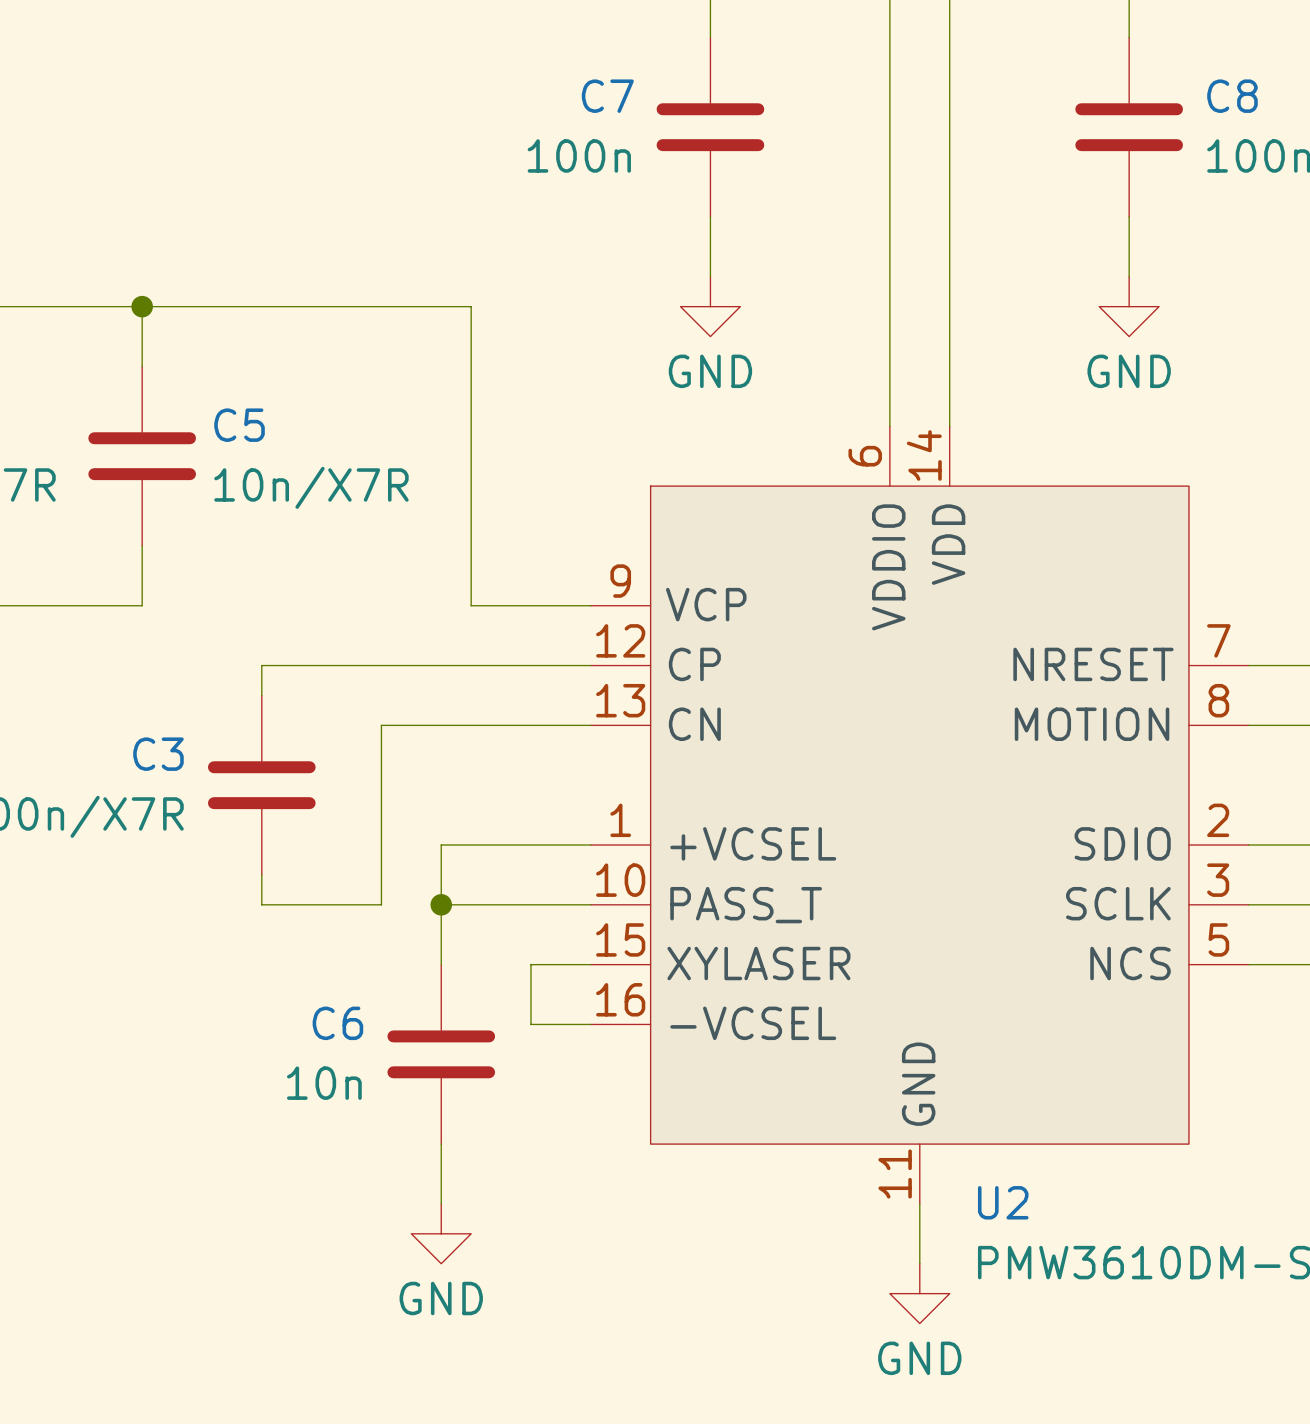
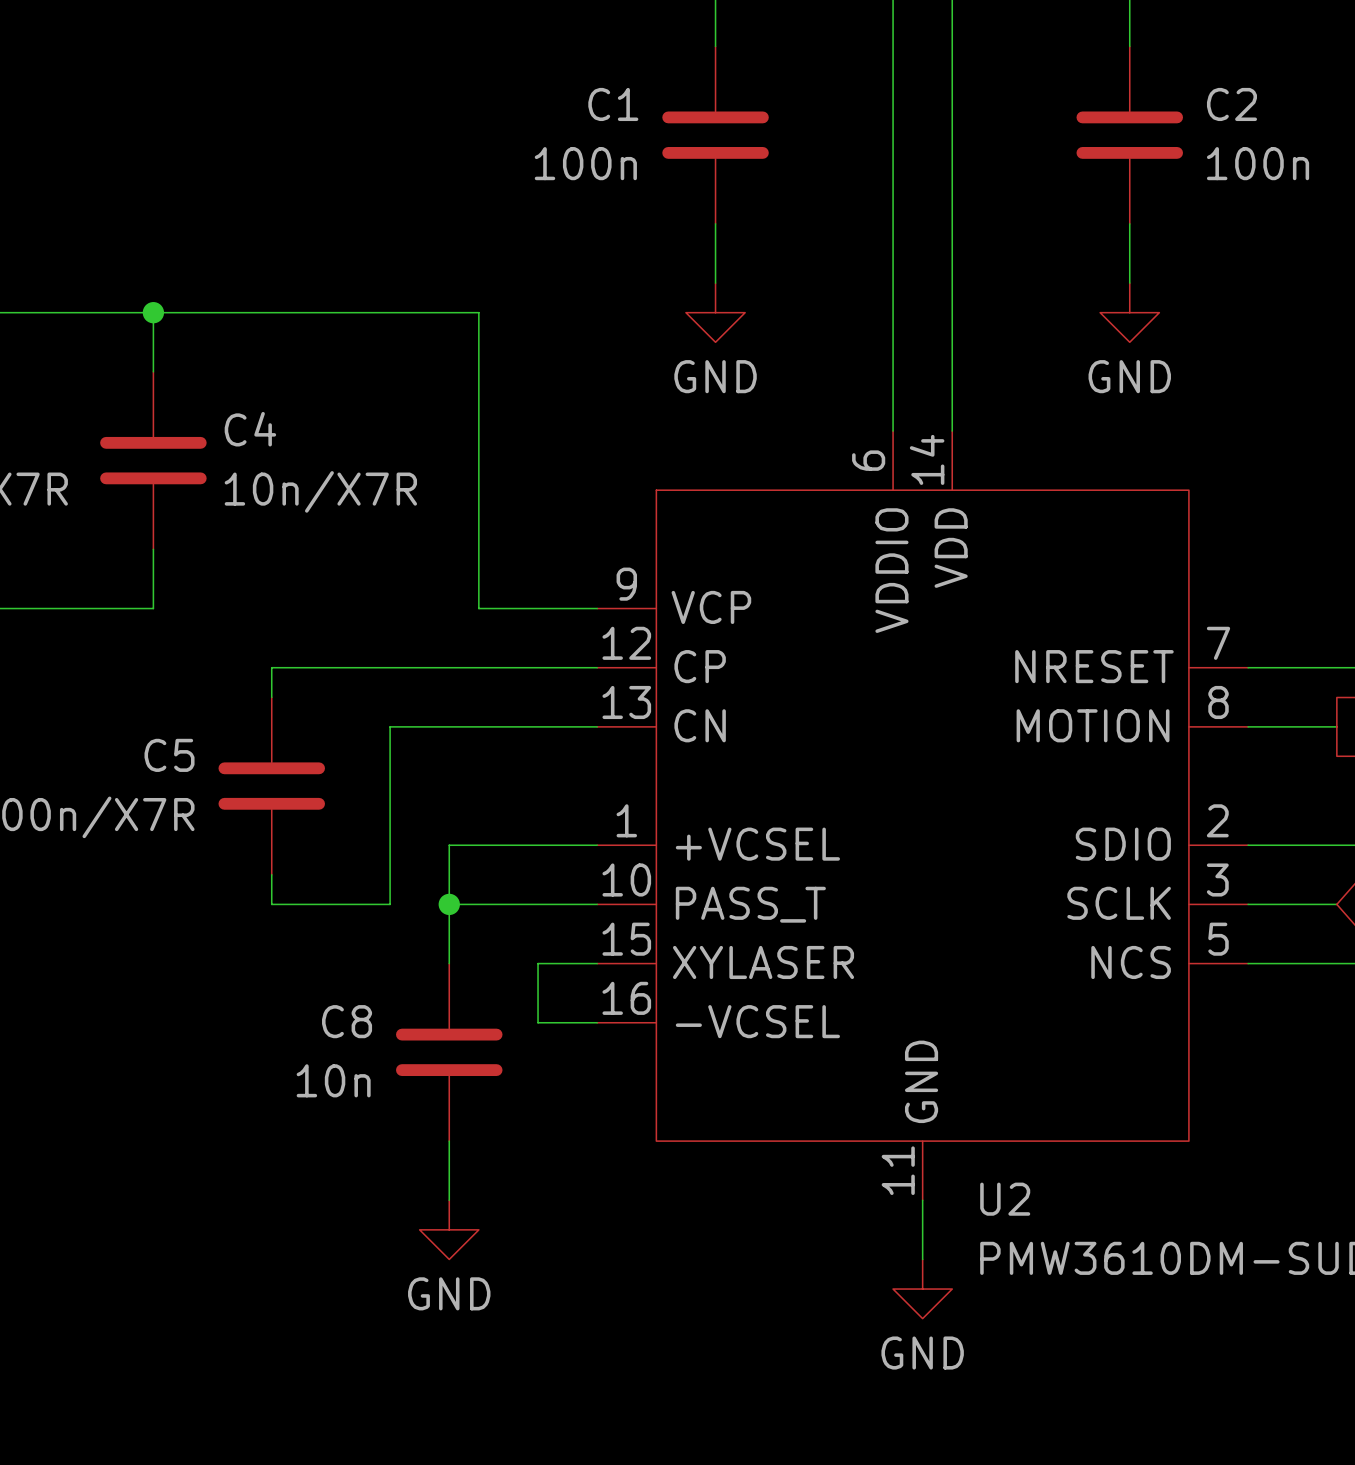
C7 name: C7 (607, 96) -> C1 (613, 104)
C8 name: C8 (1232, 96) -> C2 (1231, 104)
C5 name: C5 (239, 425) -> C4 (250, 429)
C3 name: C3 (158, 754) -> C5 (169, 755)
C6 name: C6 (337, 1023) -> C8 (347, 1021)

